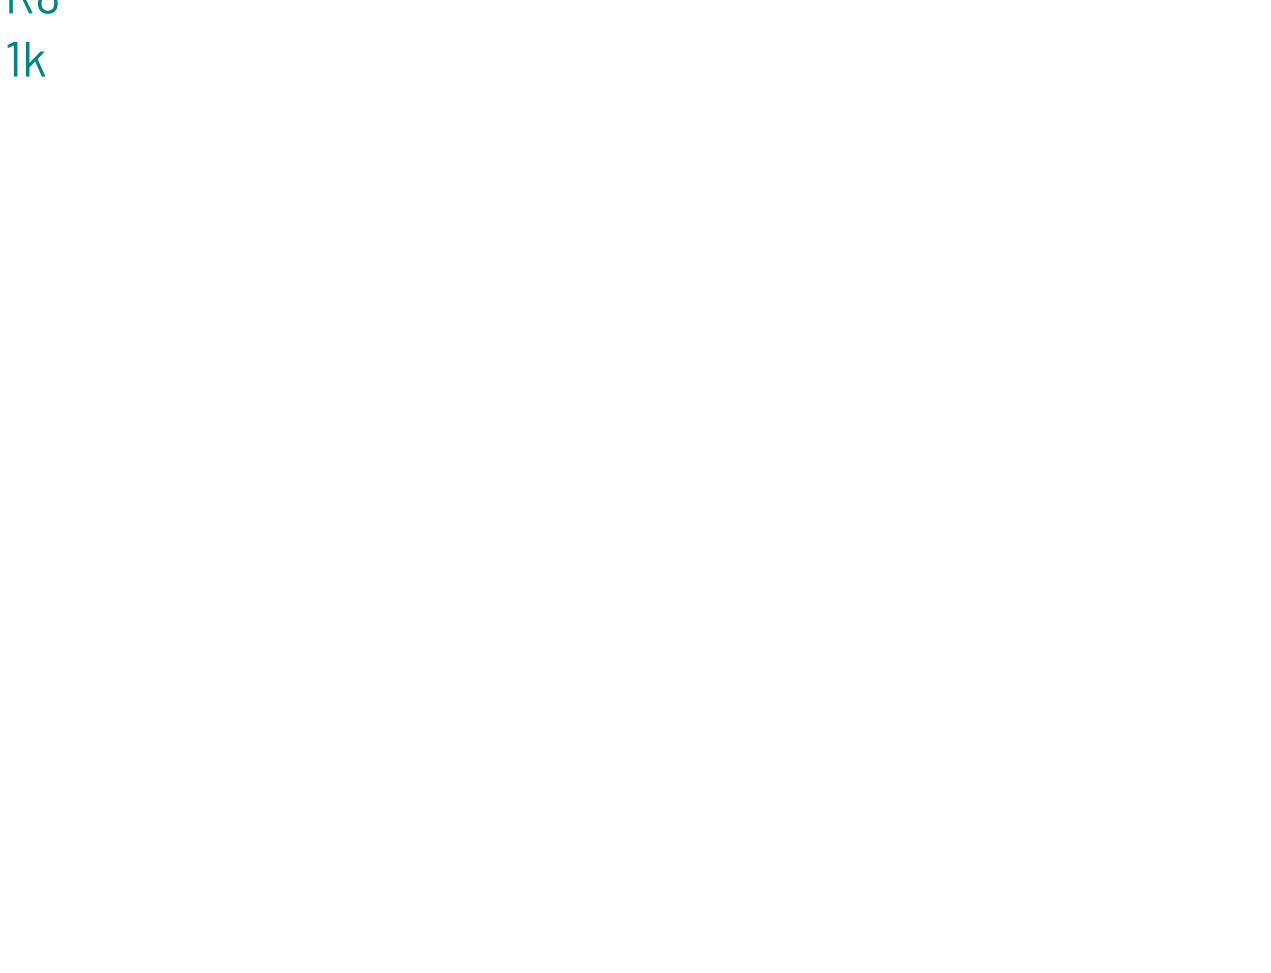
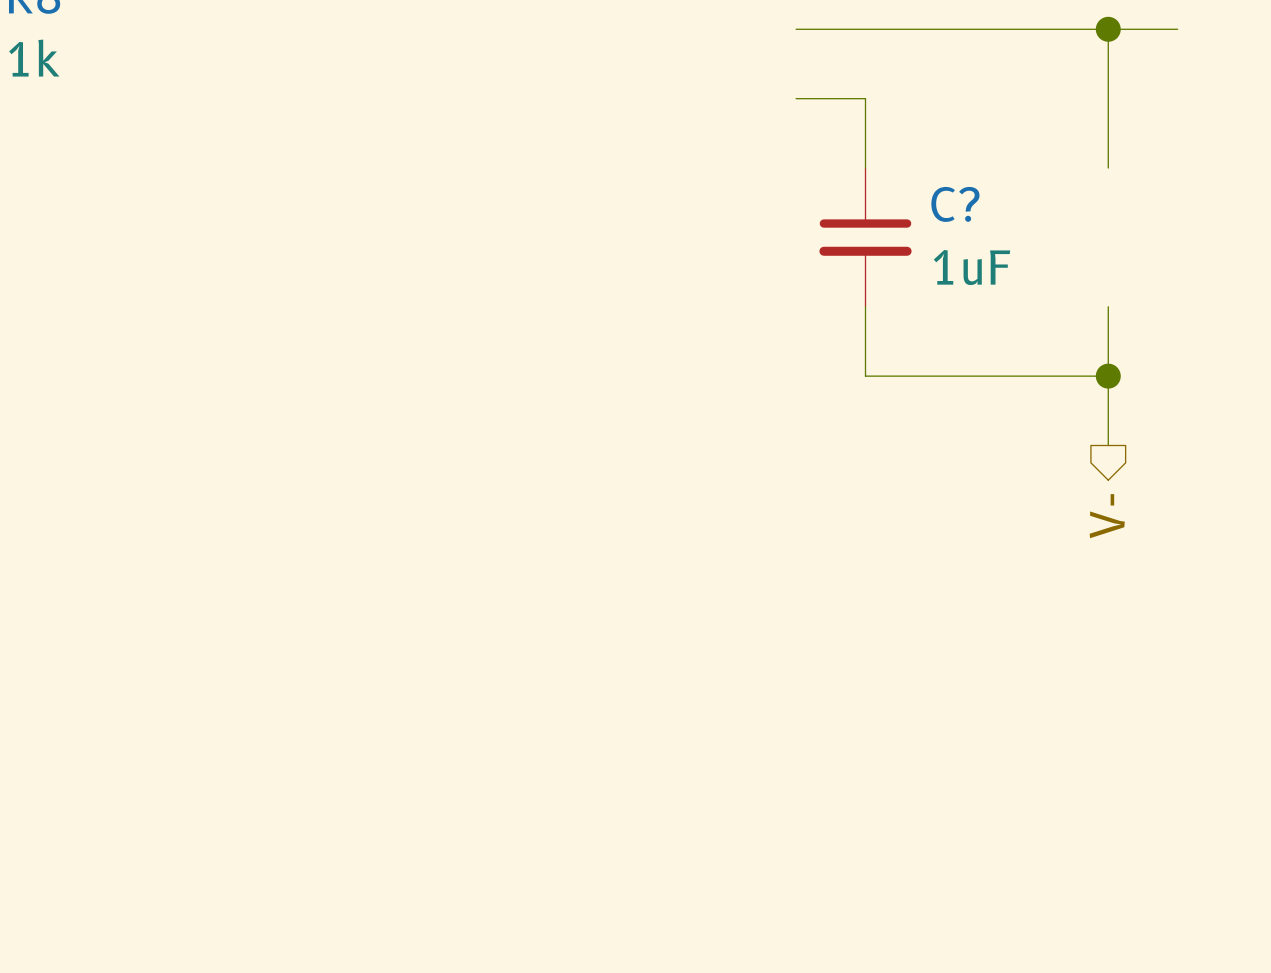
wire: none -> (796, 29) (1177, 29)
wire: none -> (1108, 29) (1108, 168)
junction: none -> (1108, 29)
wire: none -> (796, 98) (865, 98) (865, 168)
C?: none -> 1uF (865, 237)
wire: none -> (865, 306) (865, 376) (1108, 376)
wire: none -> (1108, 306) (1108, 445)
junction: none -> (1108, 376)
hierarchical label: none -> V- (1107, 516)

